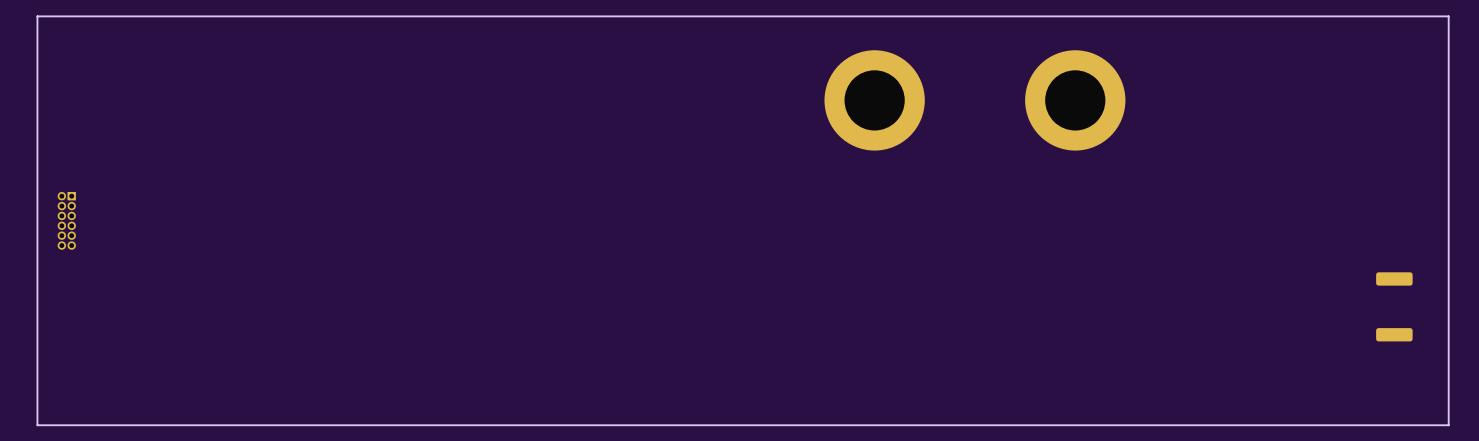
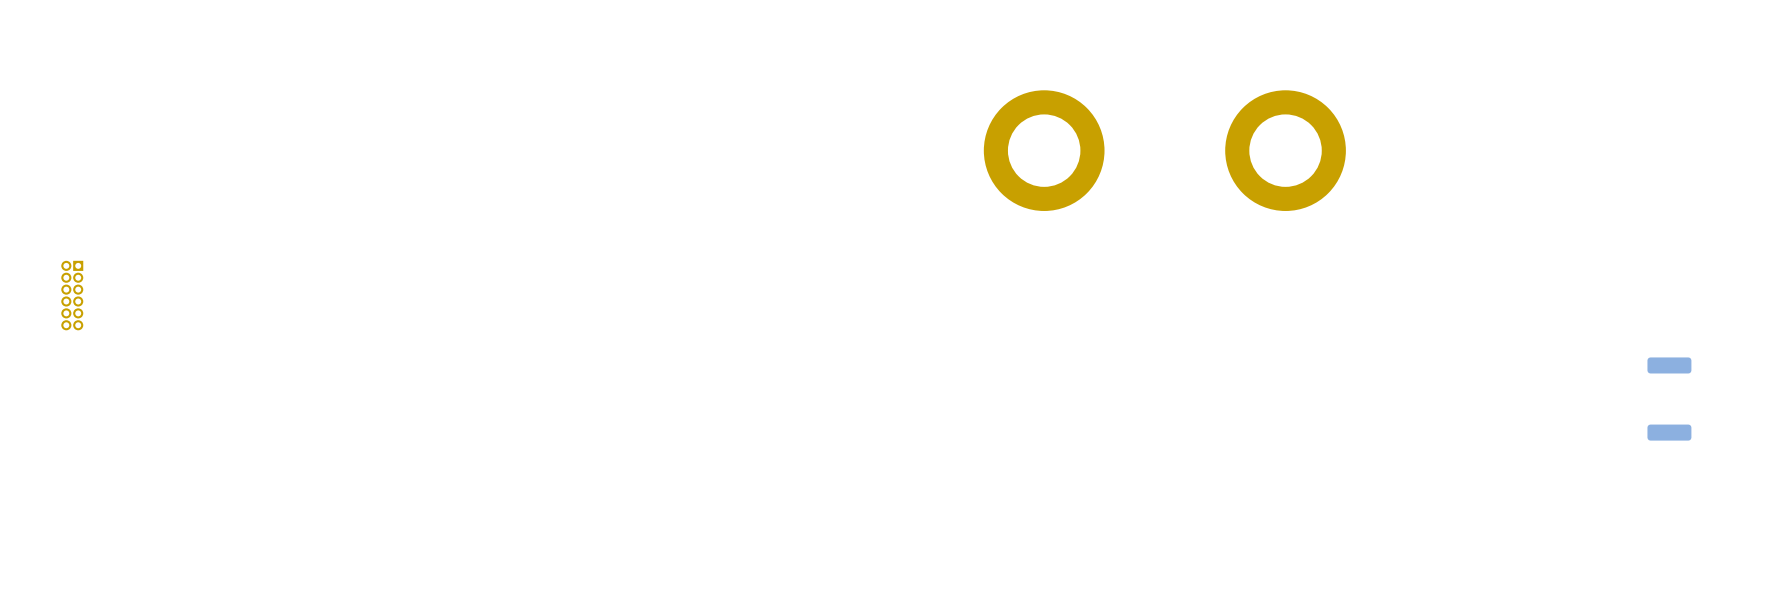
board edge: (1448, 16) (37, 16) (37, 425) (1448, 425) (1448, 16) -> none

